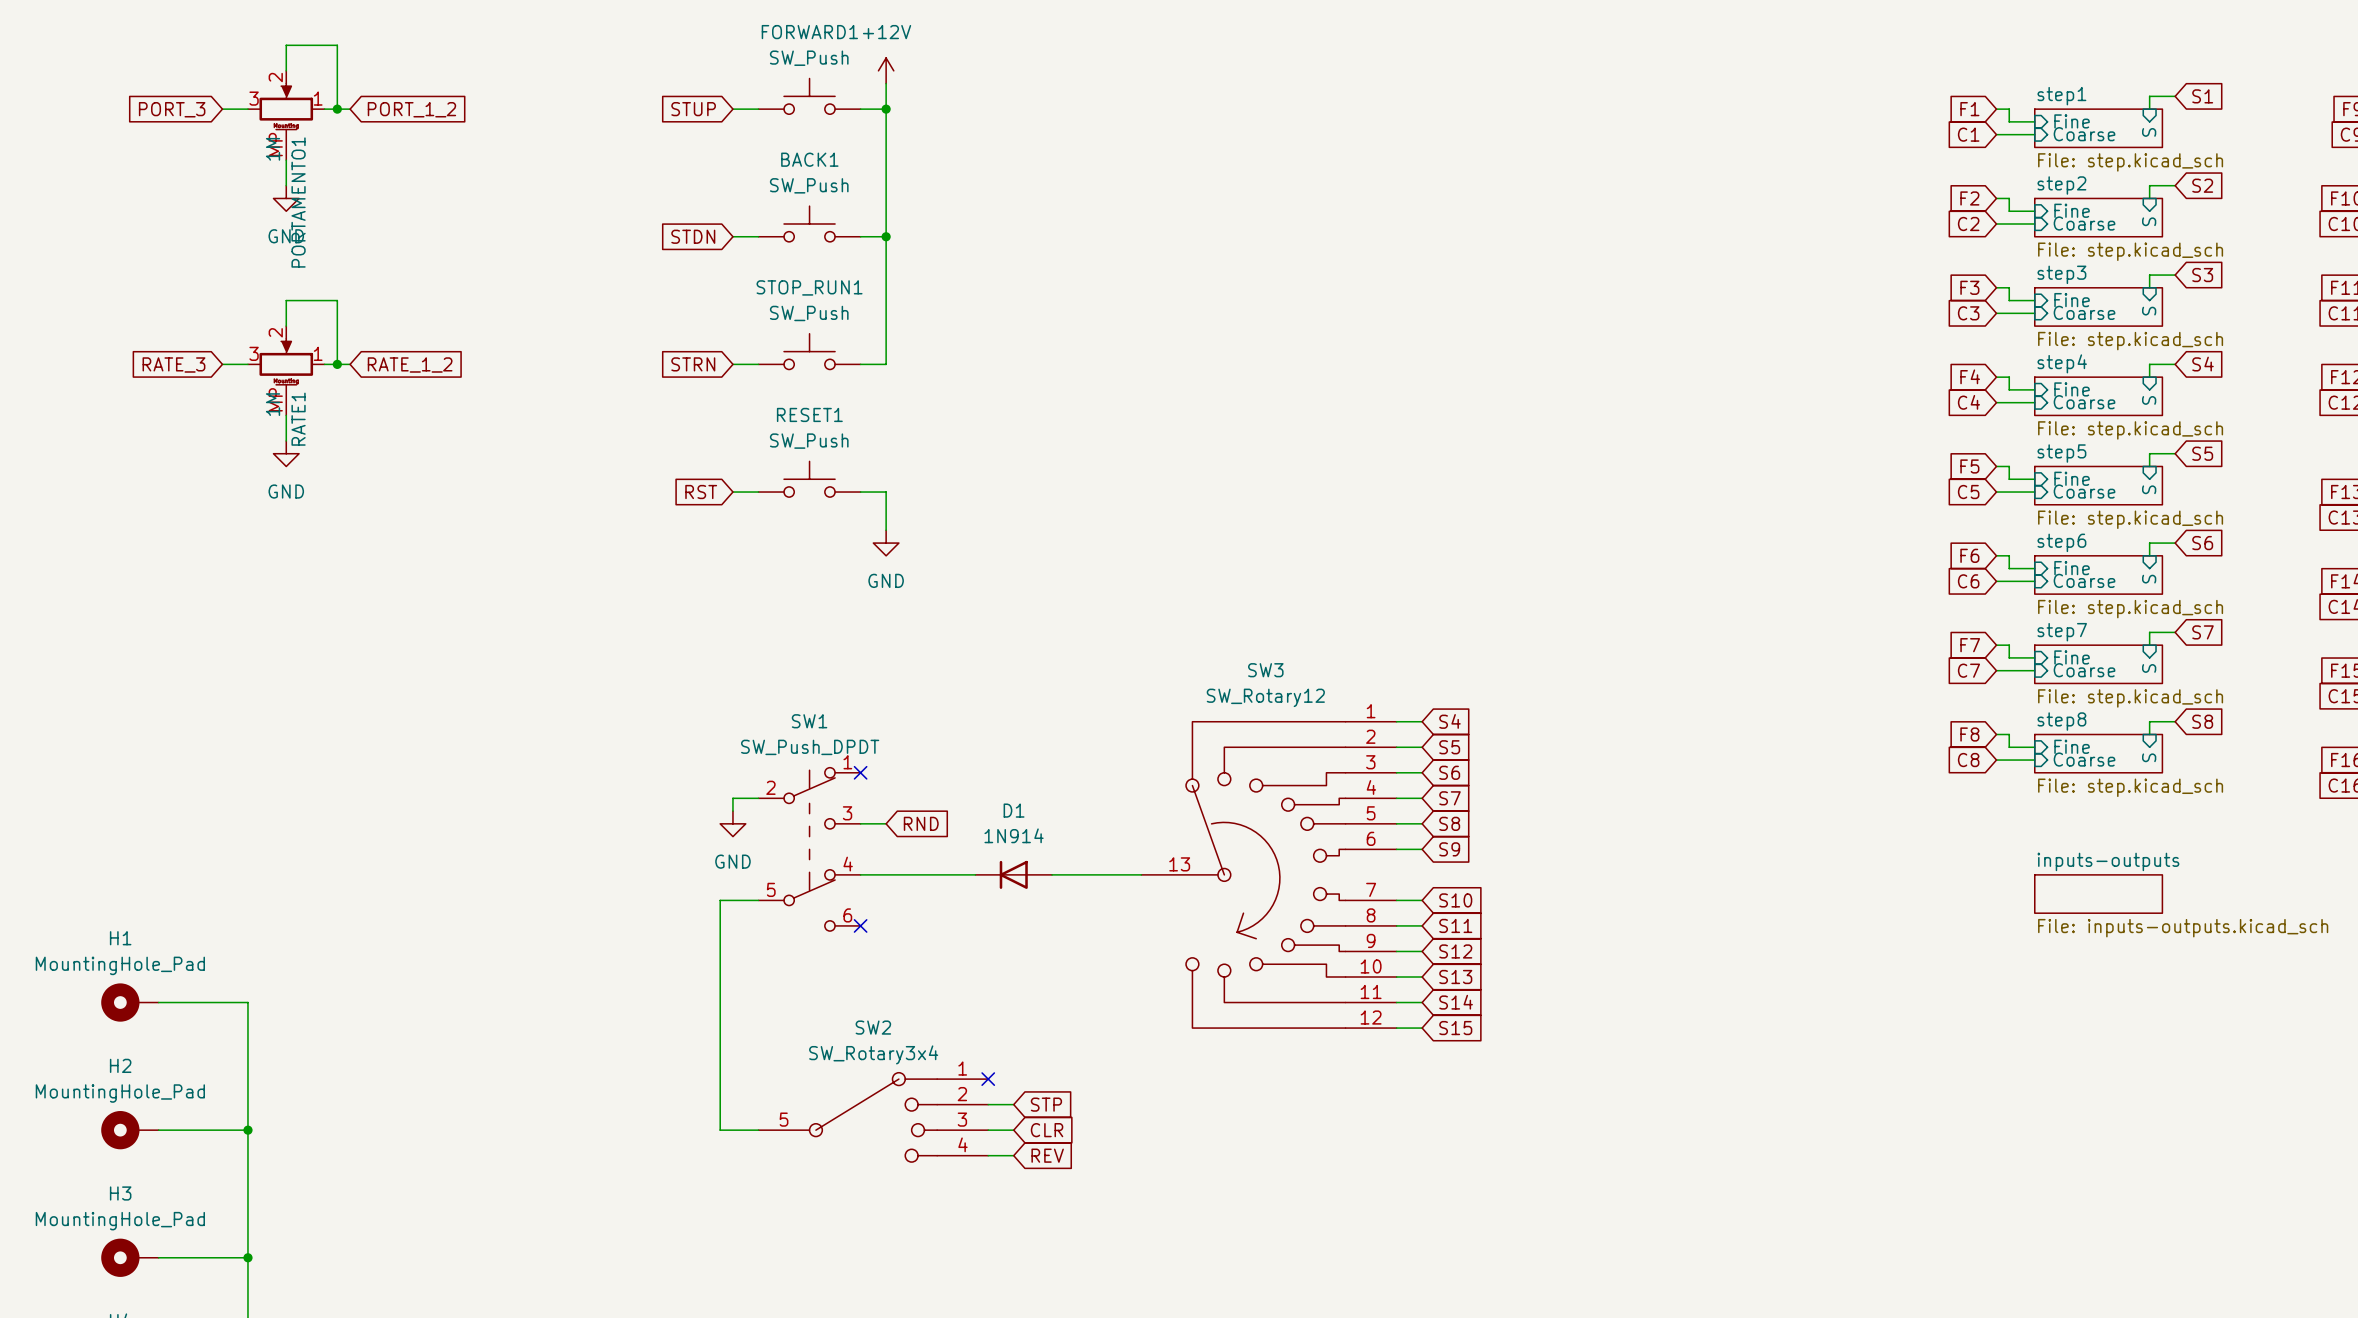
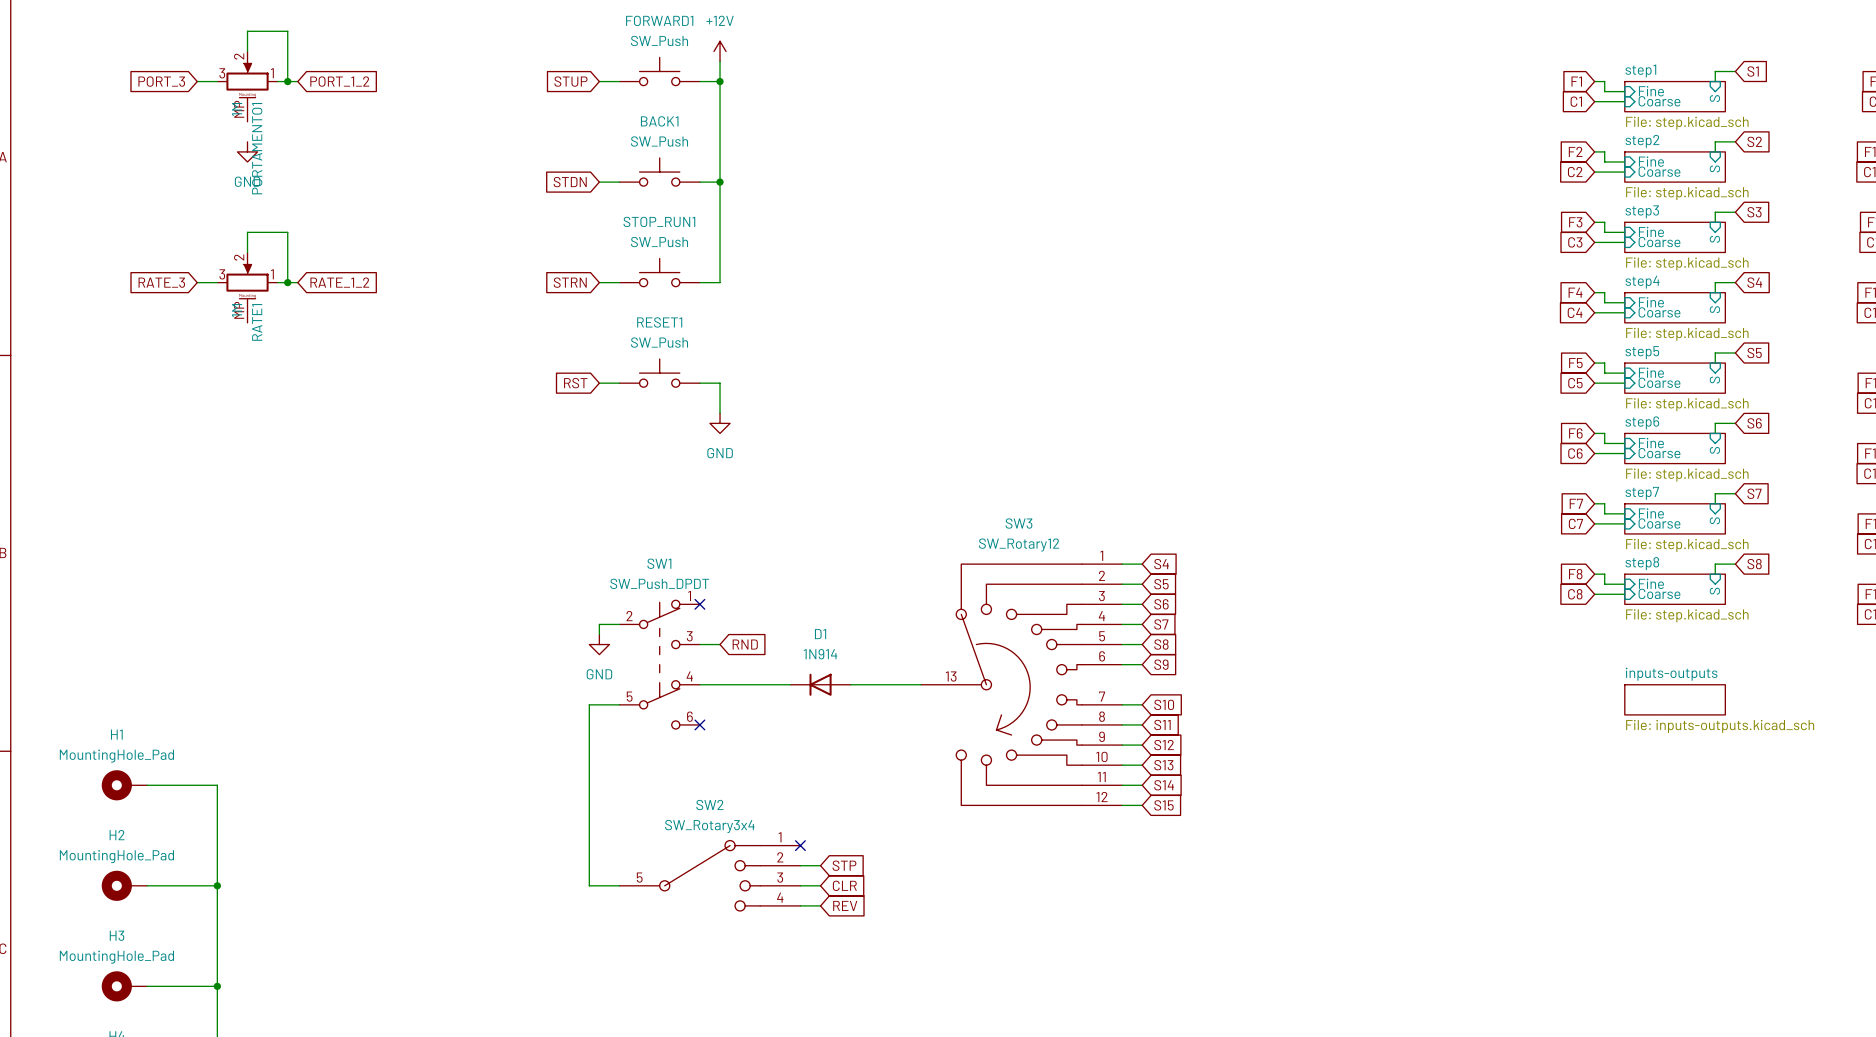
wire: (286, 160) (286, 185) -> none
wire: (286, 415) (286, 440) -> none
power symbol: GND (286, 453) -> none

